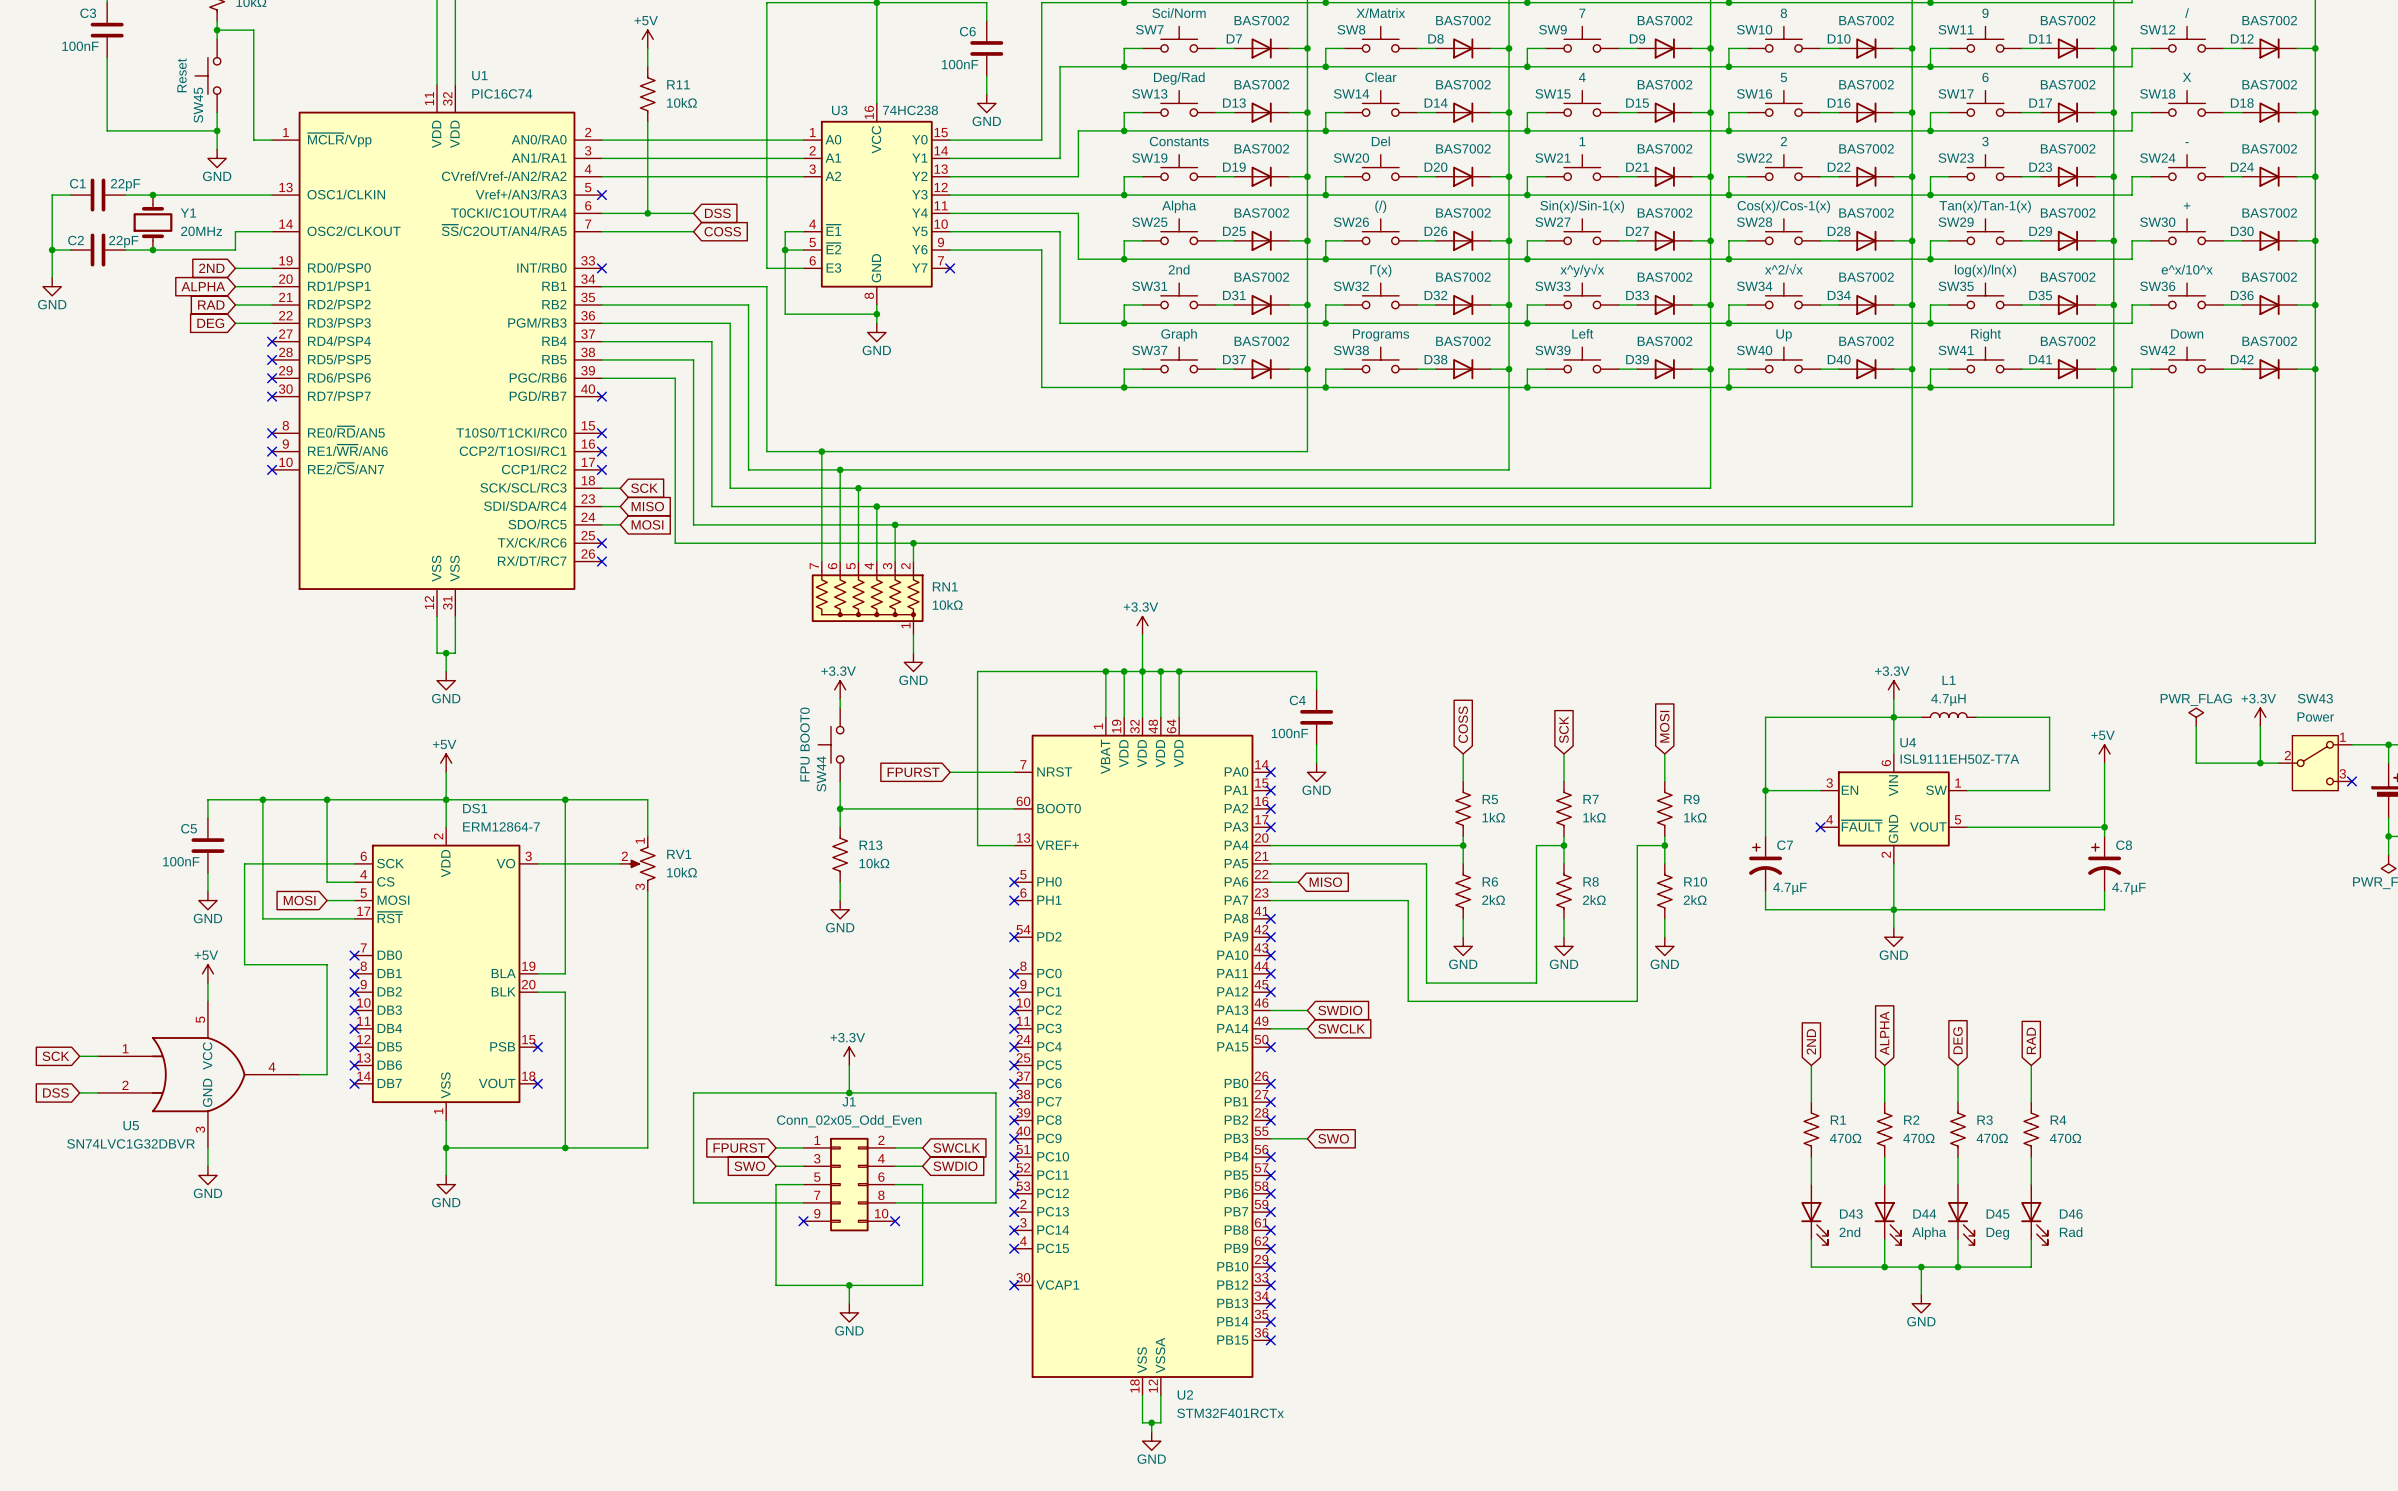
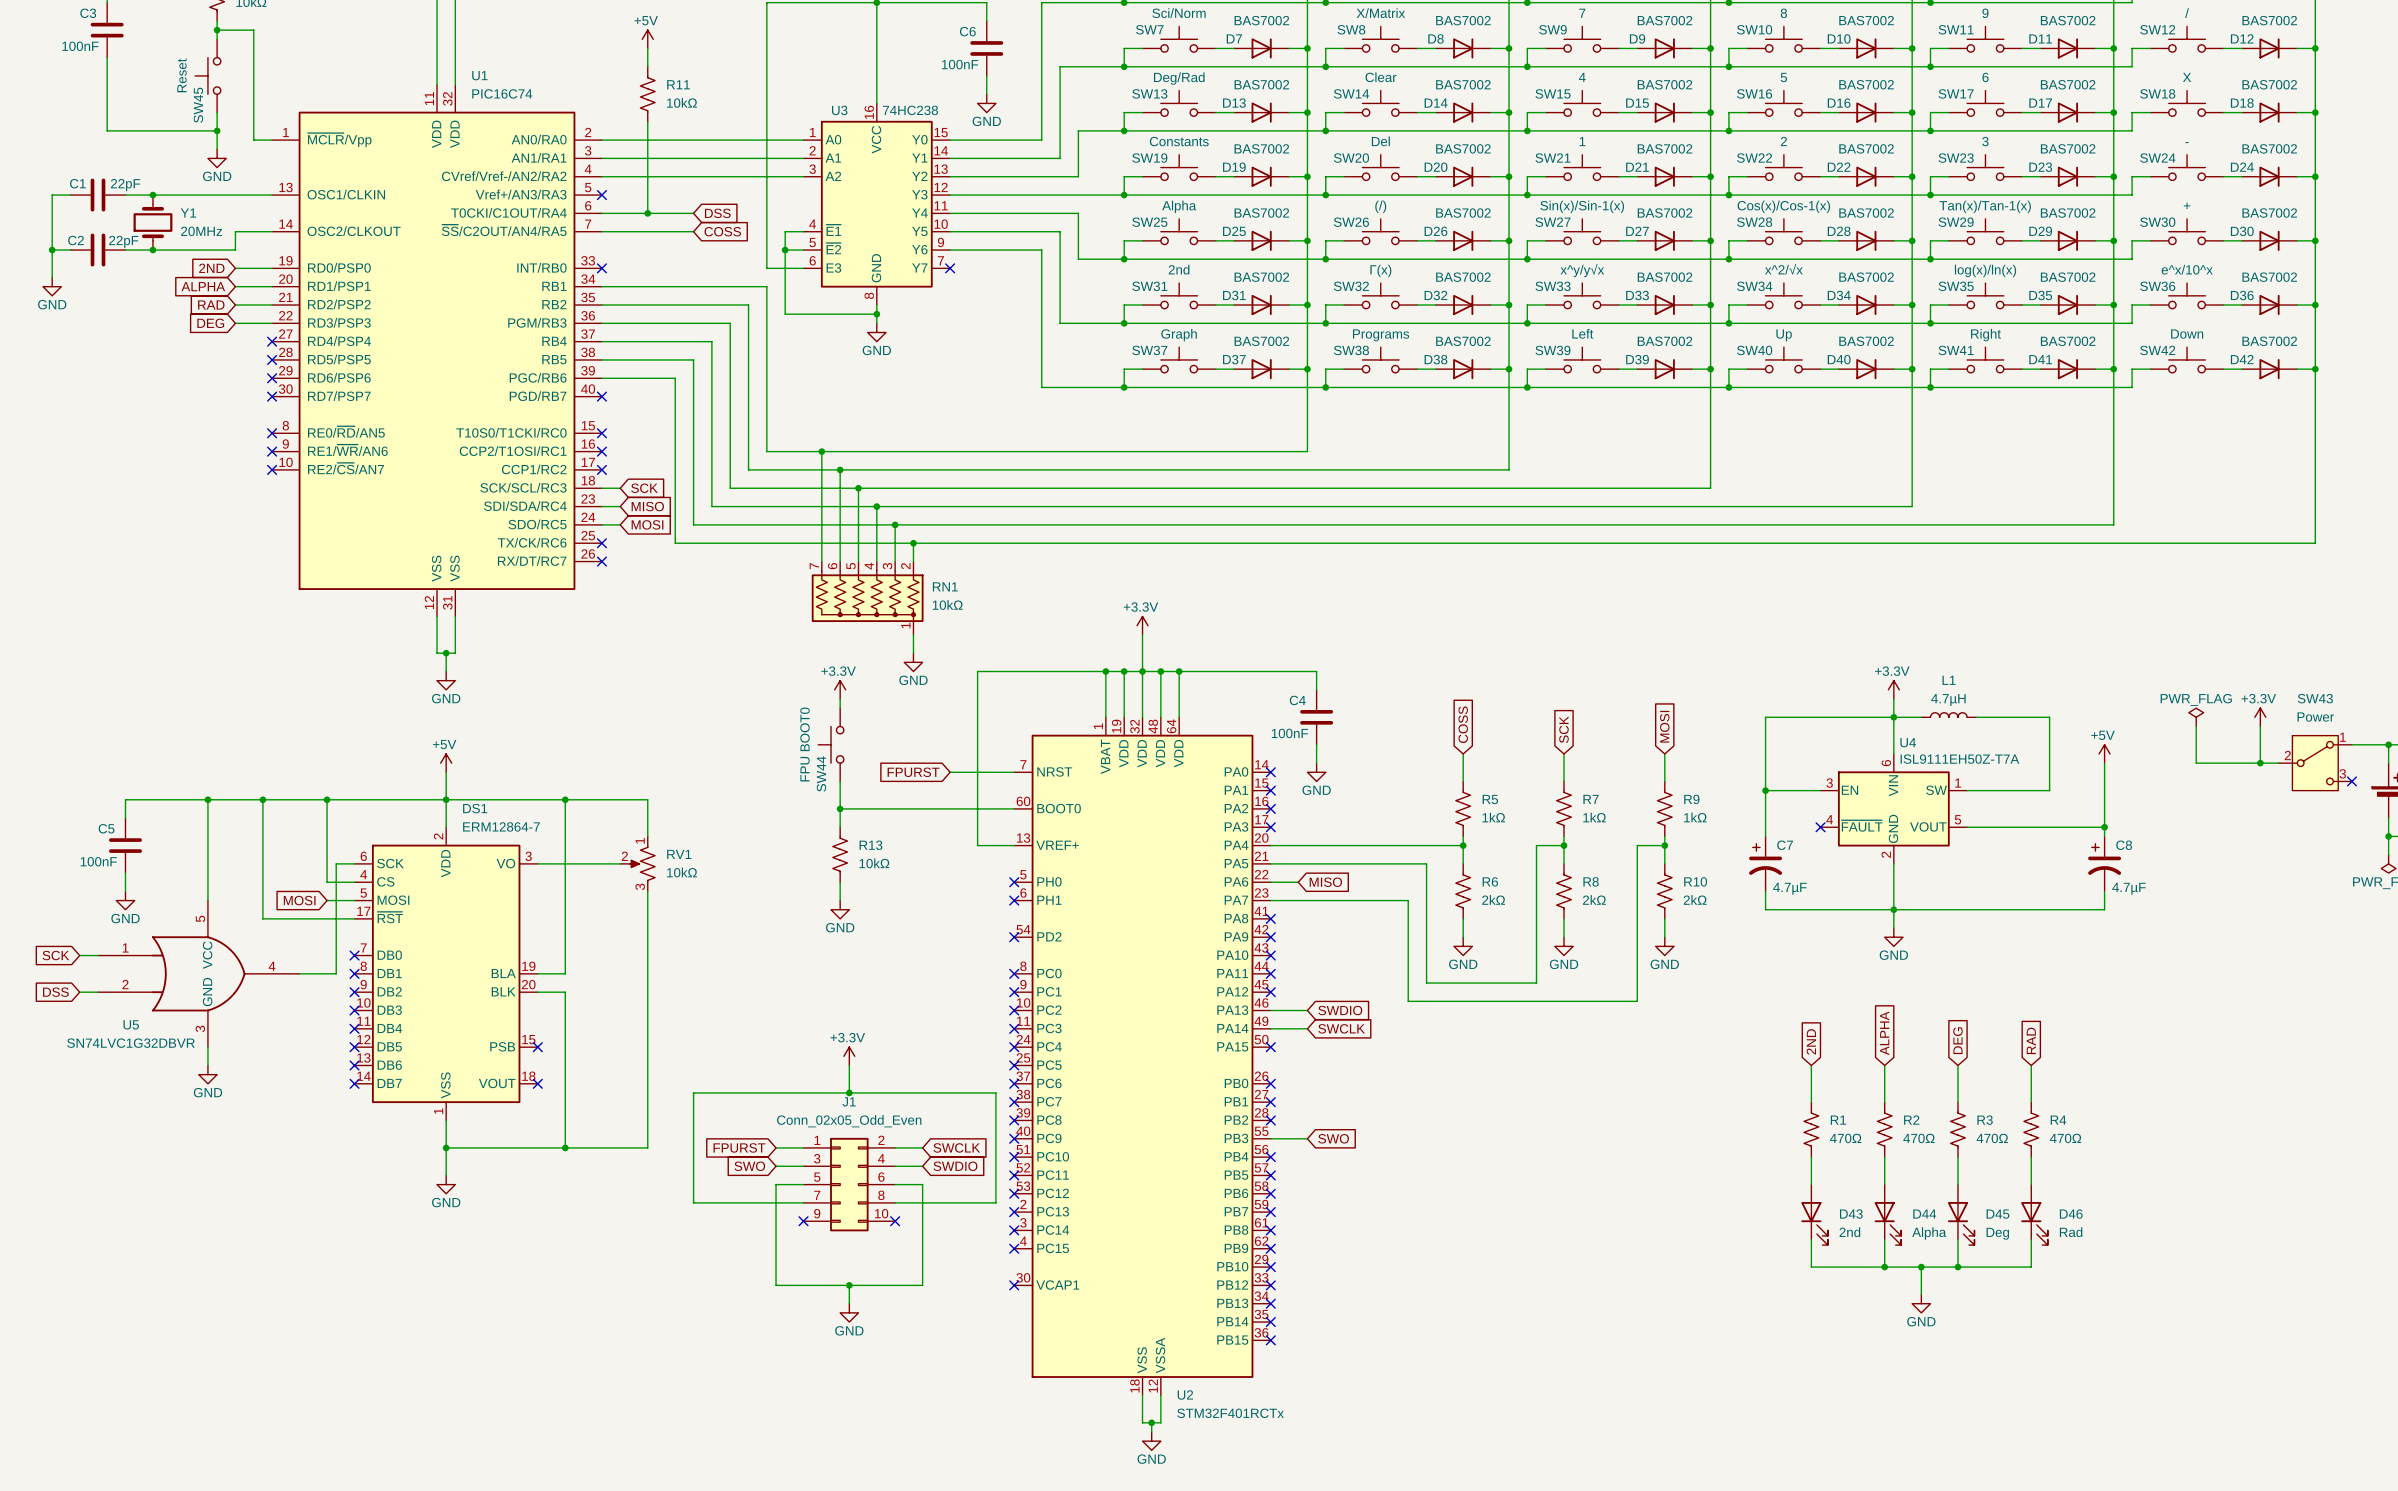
wire: none -> (207, 799) (125, 799) (125, 818)
junction: none -> (207, 799)
C5 position: (207, 845) -> (125, 845)
wire: (336, 863) (244, 863) (244, 964) (327, 964) (327, 1074) (299, 1074) -> (336, 863) (336, 973) (299, 973)
power symbol position: GND (207, 900) -> GND (125, 900)
power symbol: +5V (207, 973) -> none
wire: (207, 983) (207, 1001) -> (125, 873) (125, 891)
global label position: SCK (55, 1056) -> SCK (55, 955)
wire: (79, 1056) (98, 1056) -> (79, 955) (98, 955)
U5 position: (198, 1074) -> (198, 973)
power symbol: none -> GND (207, 1074)
global label position: DSS (55, 1092) -> DSS (55, 992)
wire: (79, 1092) (98, 1092) -> (79, 992) (98, 992)
wire: (207, 1147) (207, 1166) -> (207, 1047) (207, 1065)
power symbol: GND (207, 1175) -> none

